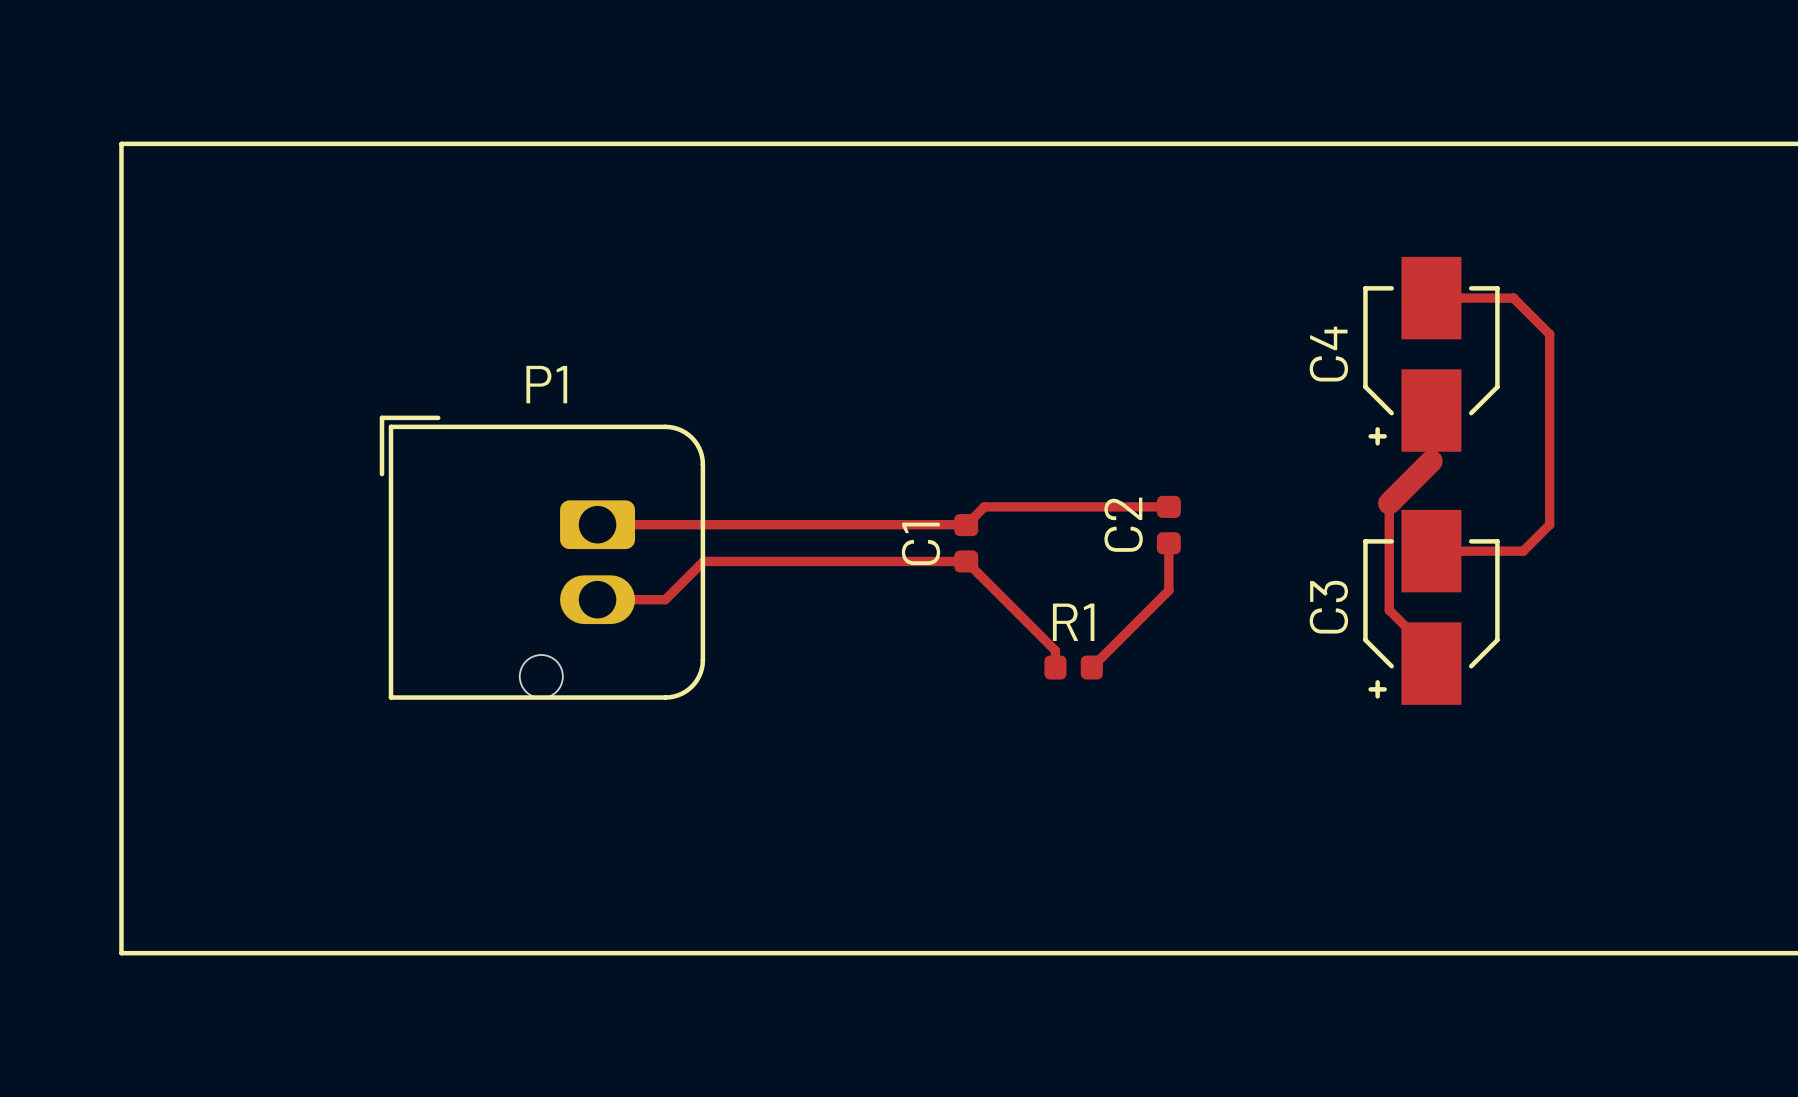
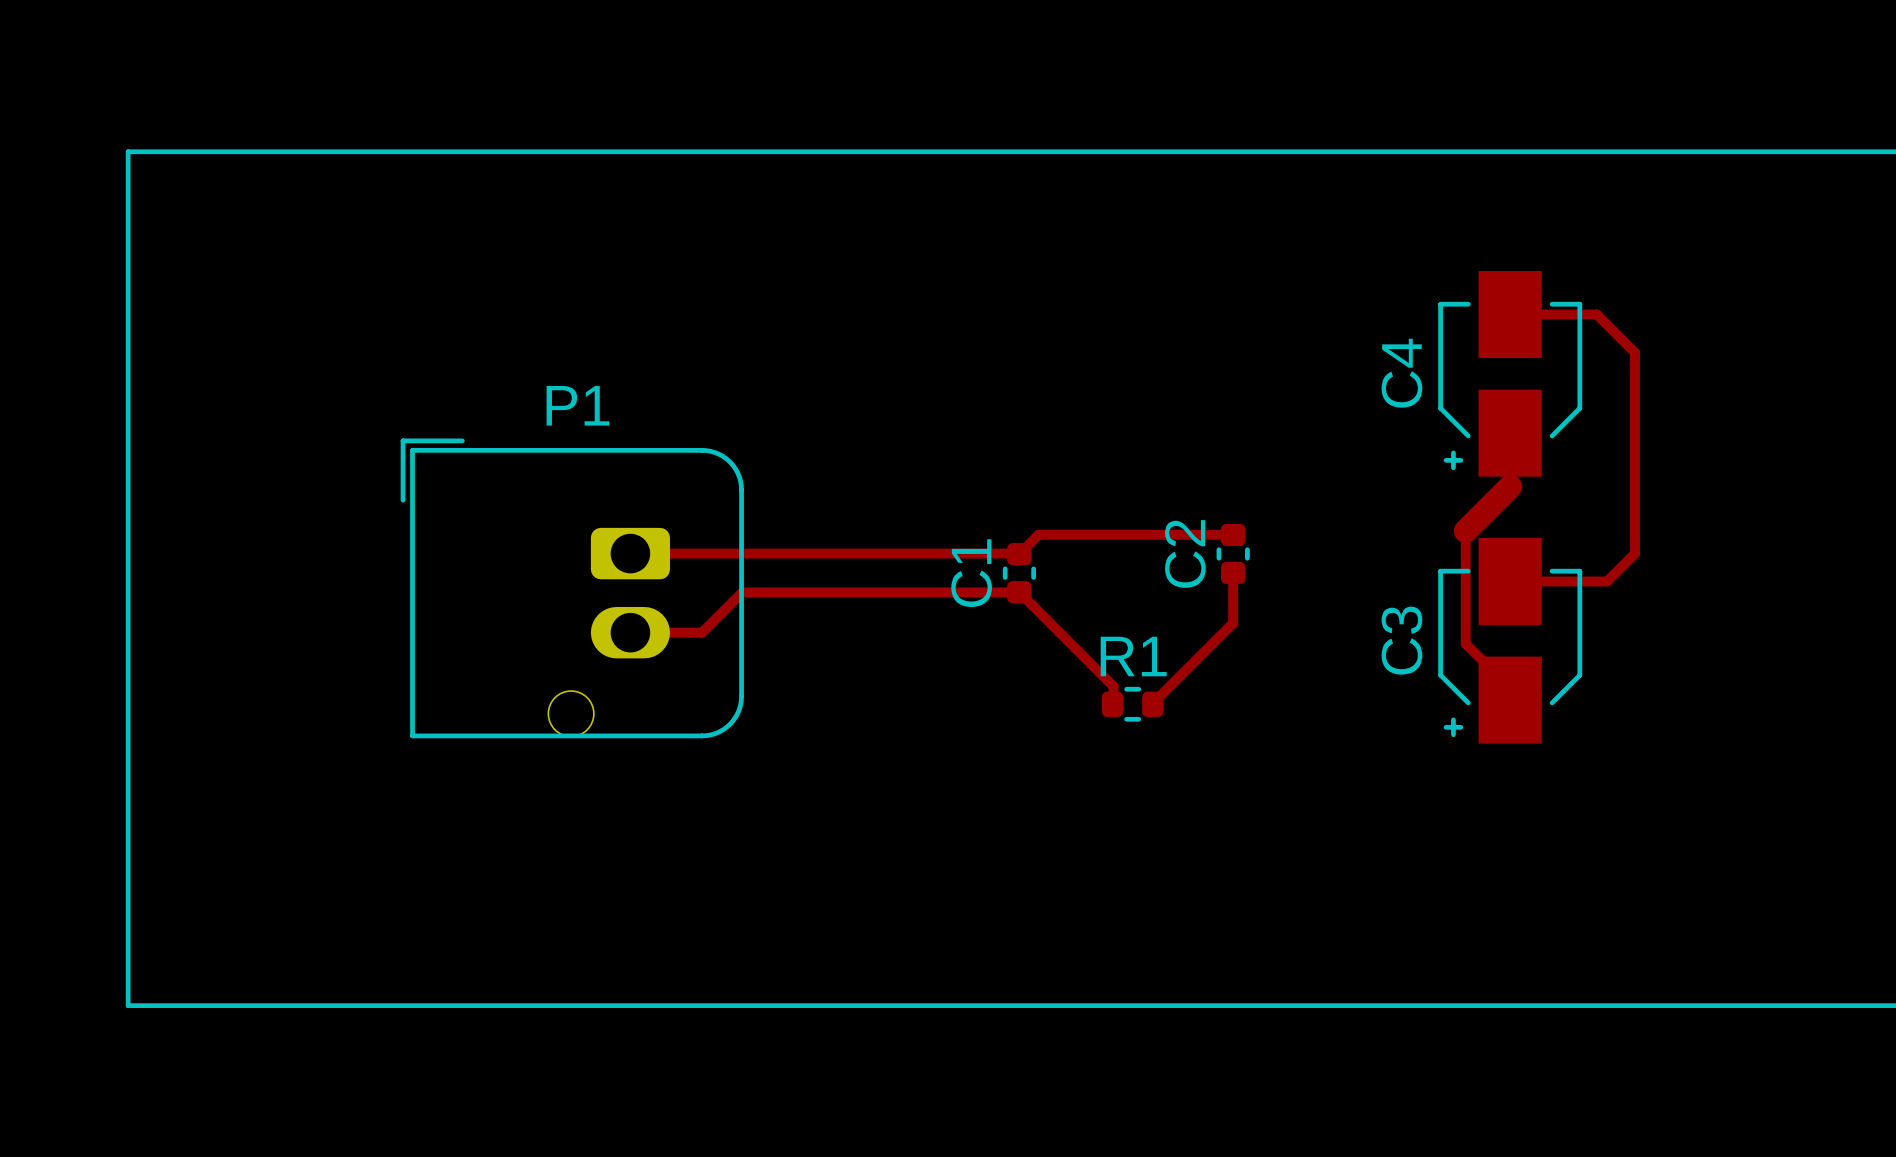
C2 footprint: [1156, 495, 1181, 555] -> [1216, 523, 1250, 585]
C1 footprint: [954, 514, 979, 573] -> [1002, 543, 1037, 604]
R1 footprint: [1044, 655, 1103, 680] -> [1101, 686, 1164, 722]

